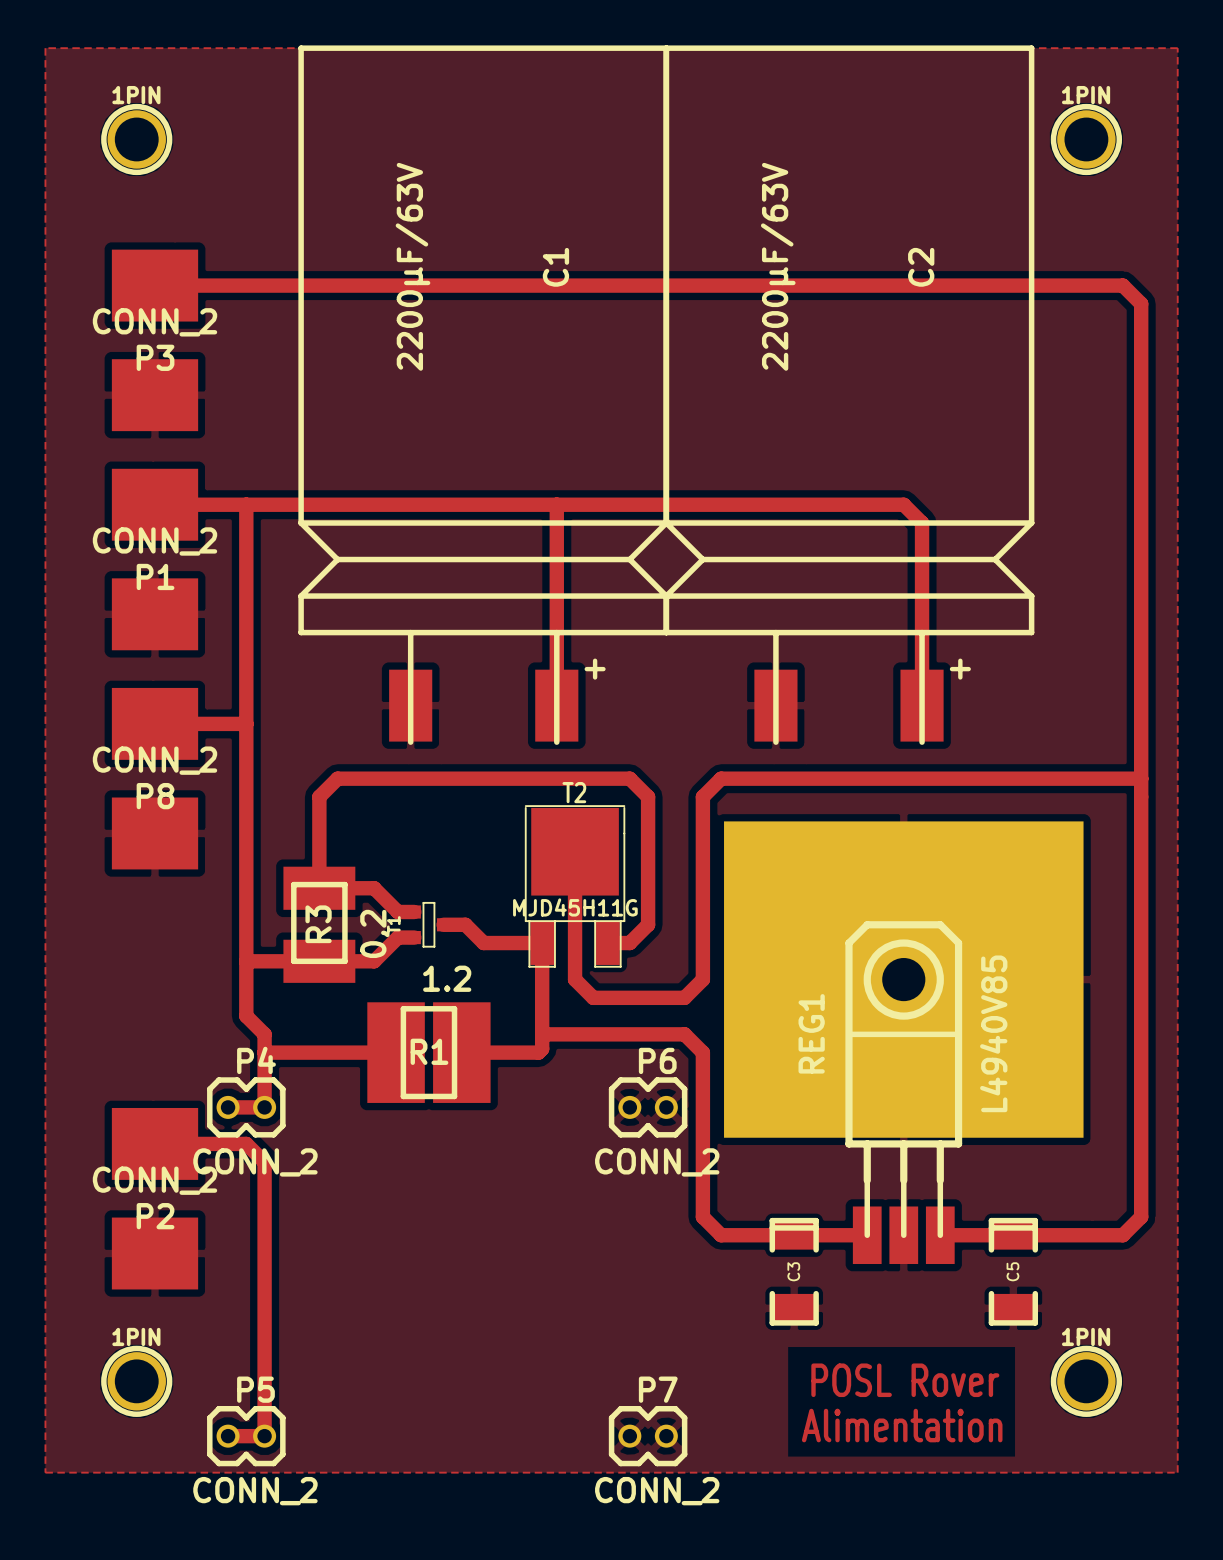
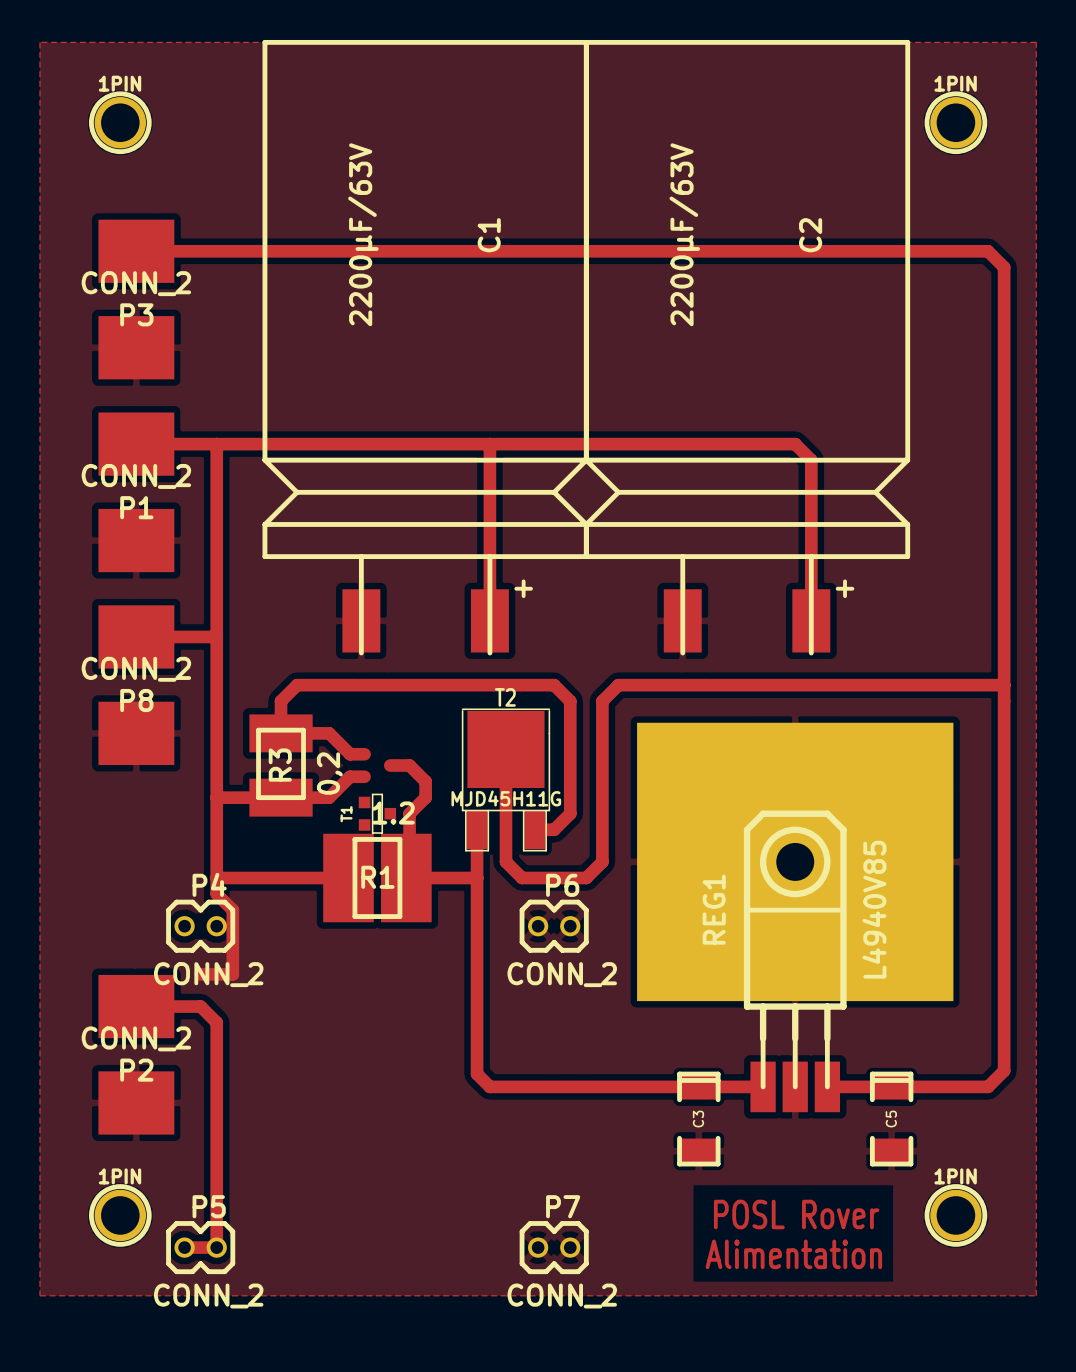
top track: (721, 778) (702, 796) (702, 979) (684, 997) (666, 997) -> (634, 685) (618, 685) (602, 701) (602, 861) (586, 878)
top track: (319, 833) (319, 888) (374, 888) (397, 911) (414, 911) -> (281, 733) (329, 733) (350, 754) (364, 754)
top track: none -> (390, 765) (409, 765) (425, 781) (425, 797) (409, 813) (409, 874) (406, 878) (477, 878)
R3 position: (319, 924) -> (281, 765)
top track: (443, 924) (465, 924) (483, 943) (542, 943) -> none
top track: (414, 937) (397, 937) (374, 961) (246, 961) -> (364, 776) (350, 776) (329, 797) (216, 797)
top track: none -> (216, 878) (348, 878)
top track: (542, 1034) (684, 1034) (702, 1052) (702, 1216) (721, 1235) -> (477, 922) (477, 1074) (489, 1086) (634, 1086)
top track: (542, 1048) (538, 1052) (461, 1052) -> none
top track: (264, 1052) (396, 1052) -> none
R1 position: (428, 1052) -> (377, 878)
P4 position: (246, 1107) -> (200, 926)
P6 position: (648, 1107) -> (554, 926)
top track: (228, 1143) (246, 1143) (264, 1162) (264, 1436) (228, 1436) -> (200, 1006) (216, 1022) (216, 1247) (184, 1247)
P5 position: (246, 1436) -> (200, 1247)
P7 position: (648, 1436) -> (554, 1247)

